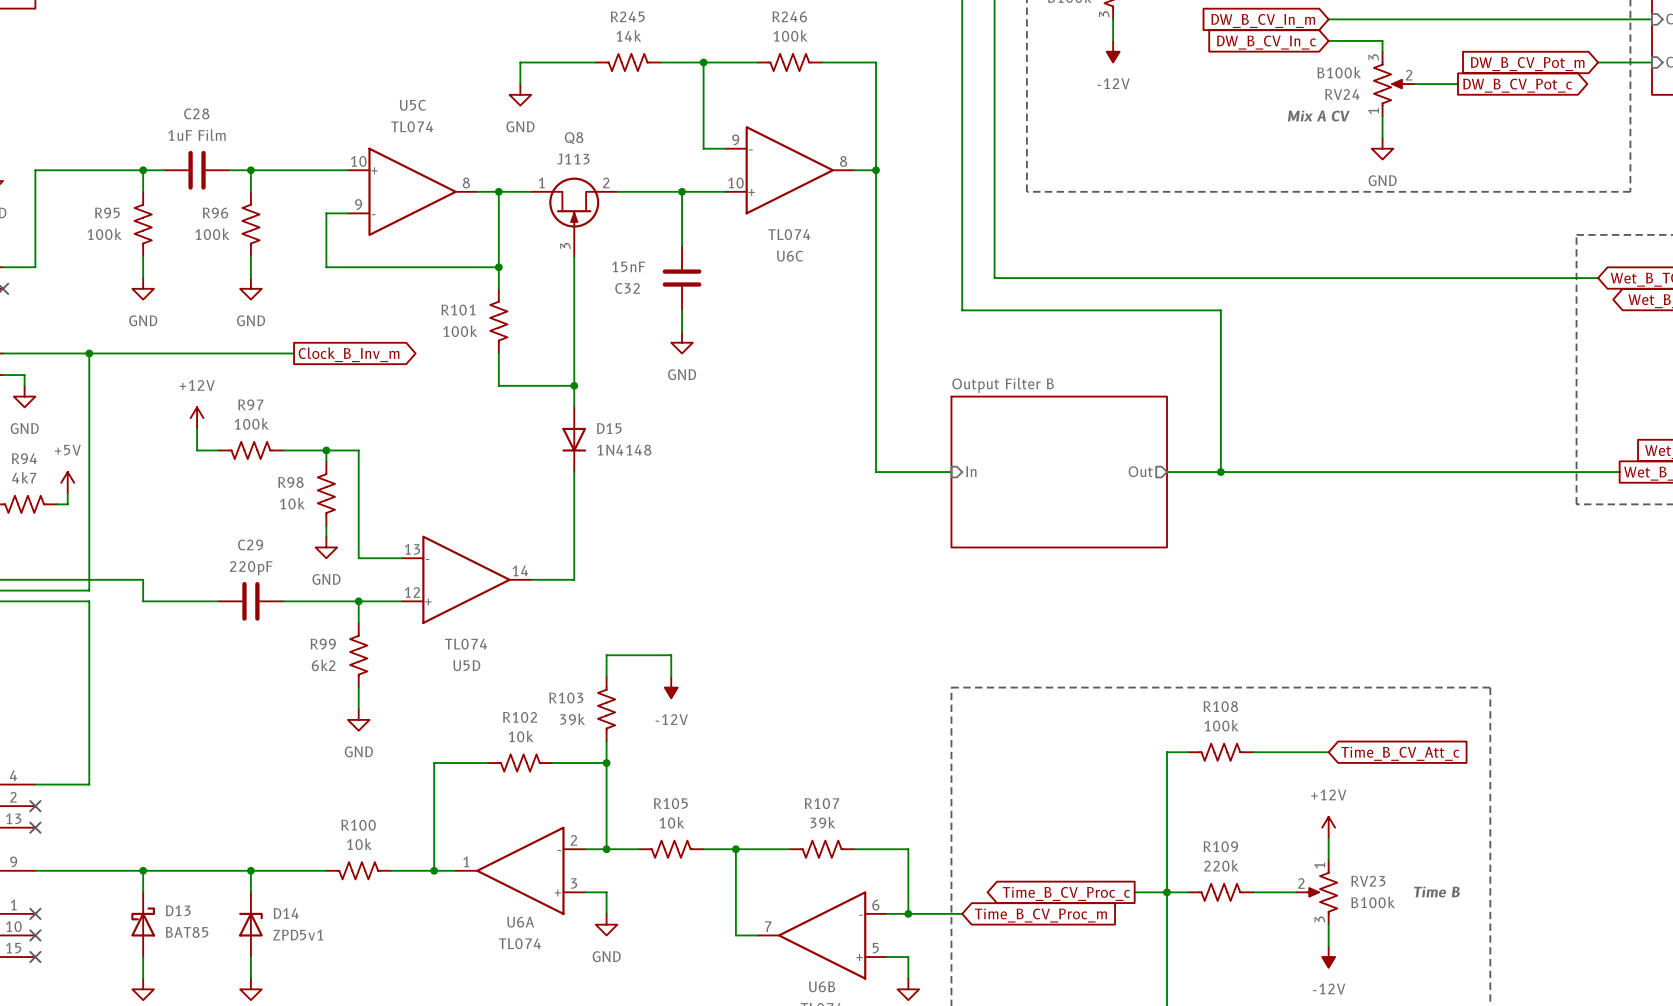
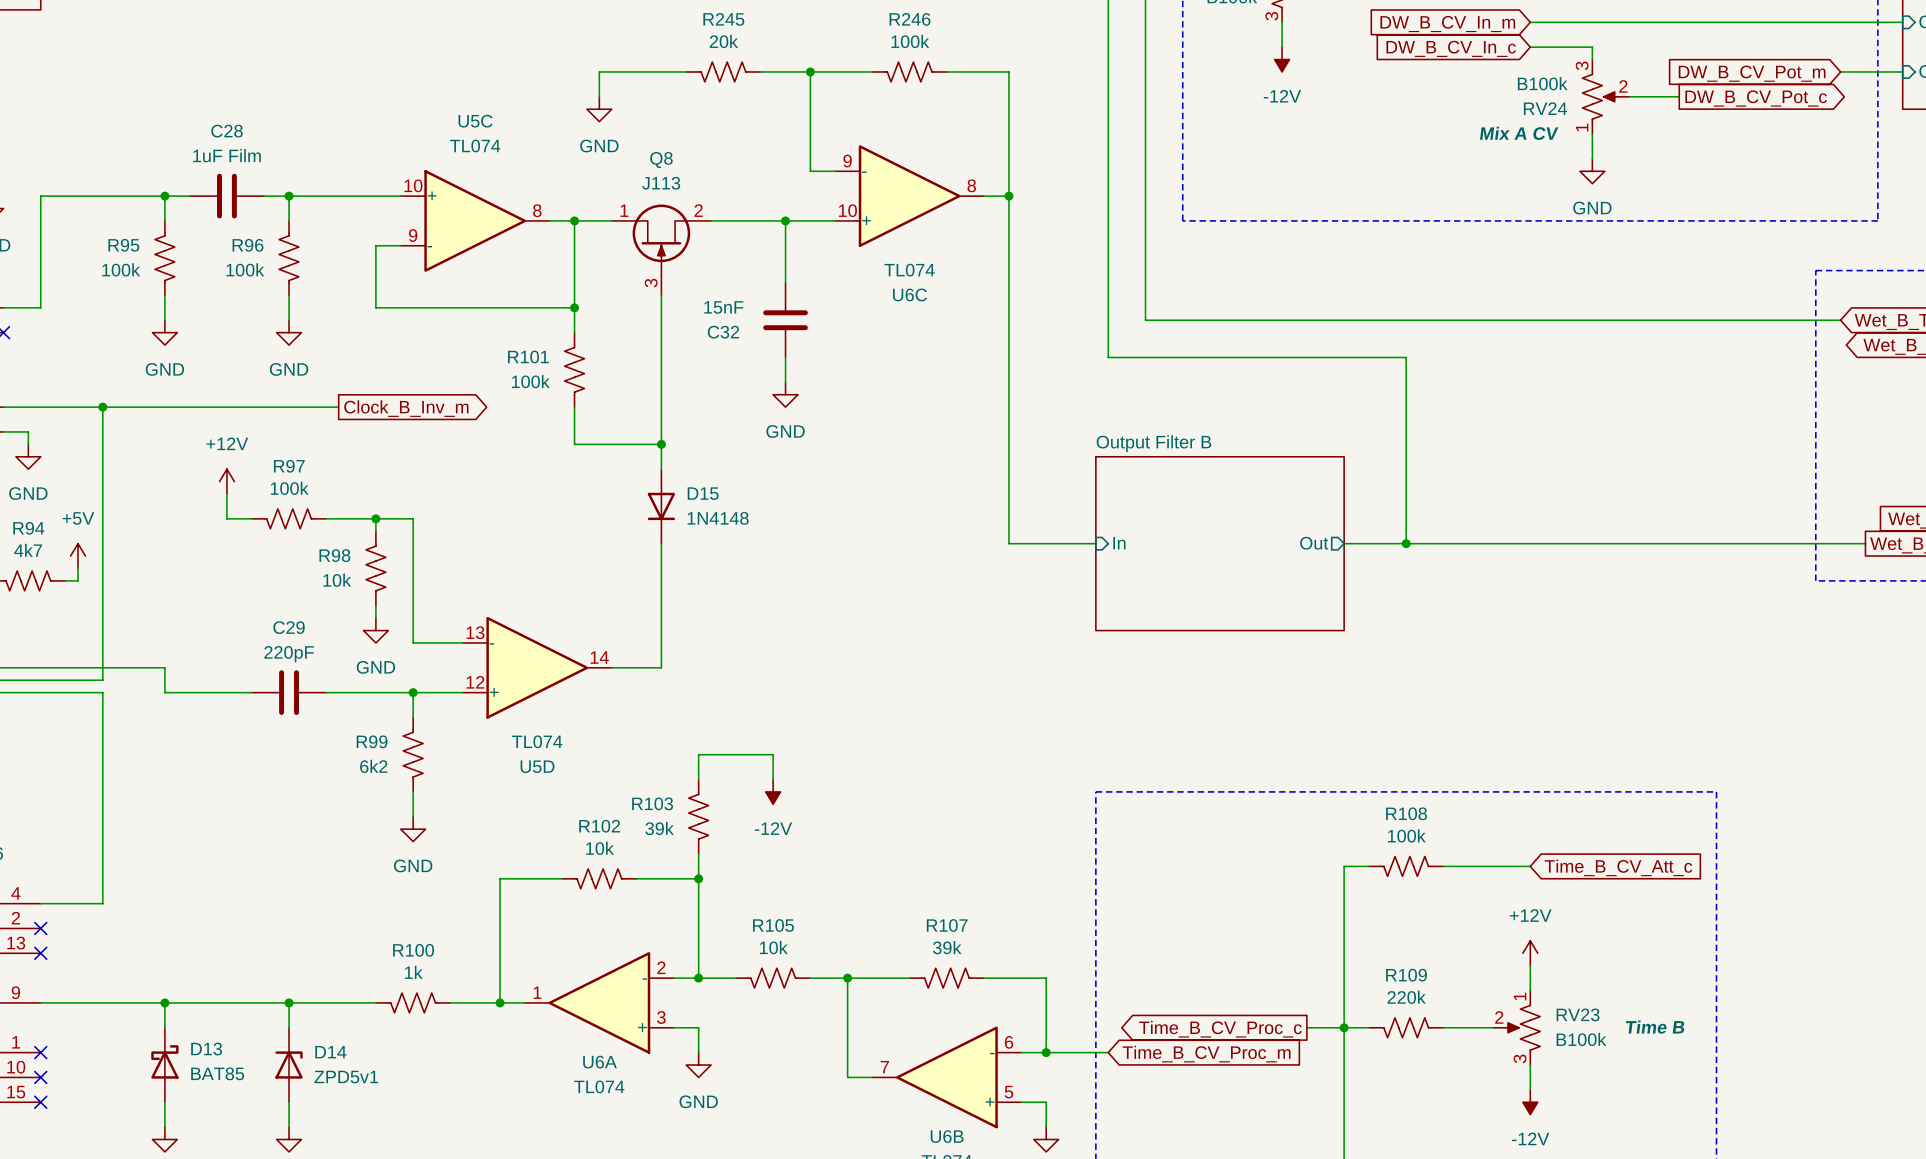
R245 value: 14k (628, 35) -> 20k (723, 41)
R100 value: 10k (359, 844) -> 1k (413, 972)

